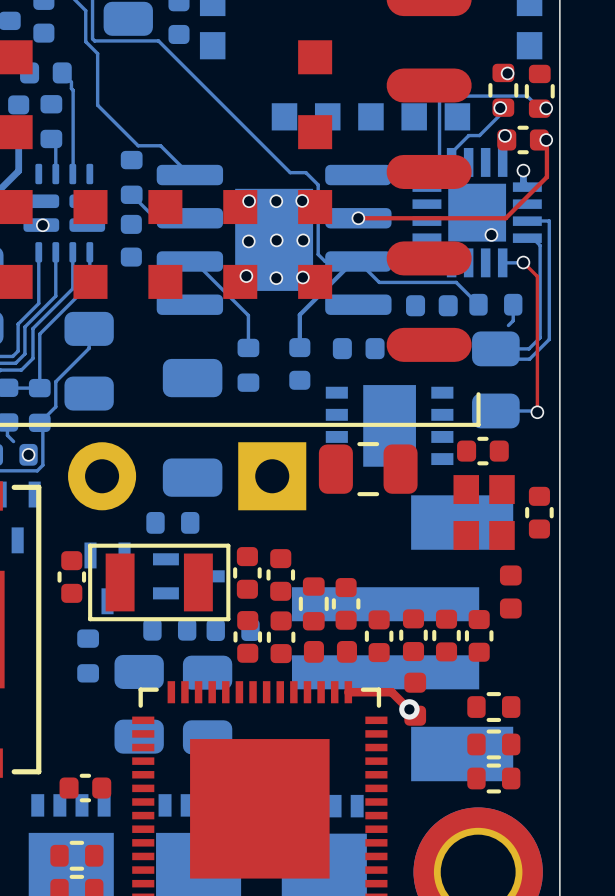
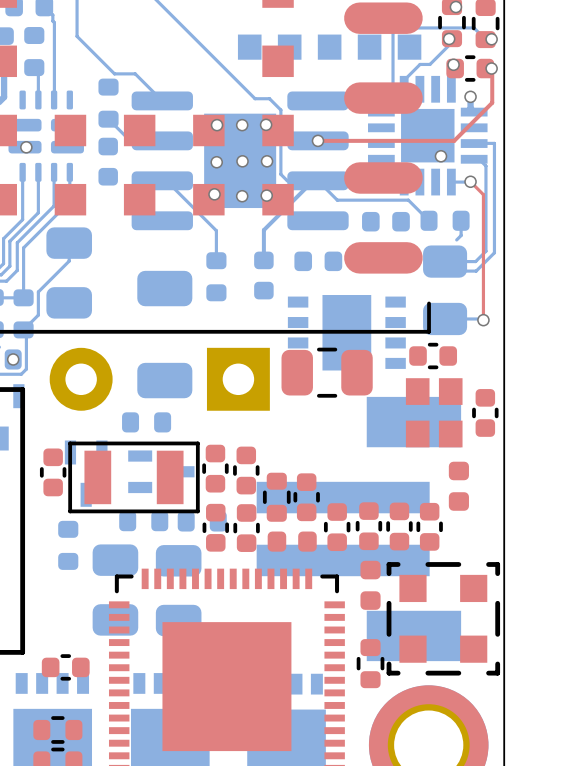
top track: (348, 692) (391, 692) (415, 715) (409, 709) -> none
part: (493, 707) -> none
via: (409, 709) -> none
part footprint: [467, 729, 521, 760] -> [386, 562, 501, 676]
part: (493, 778) -> none
part: none -> (370, 663)

